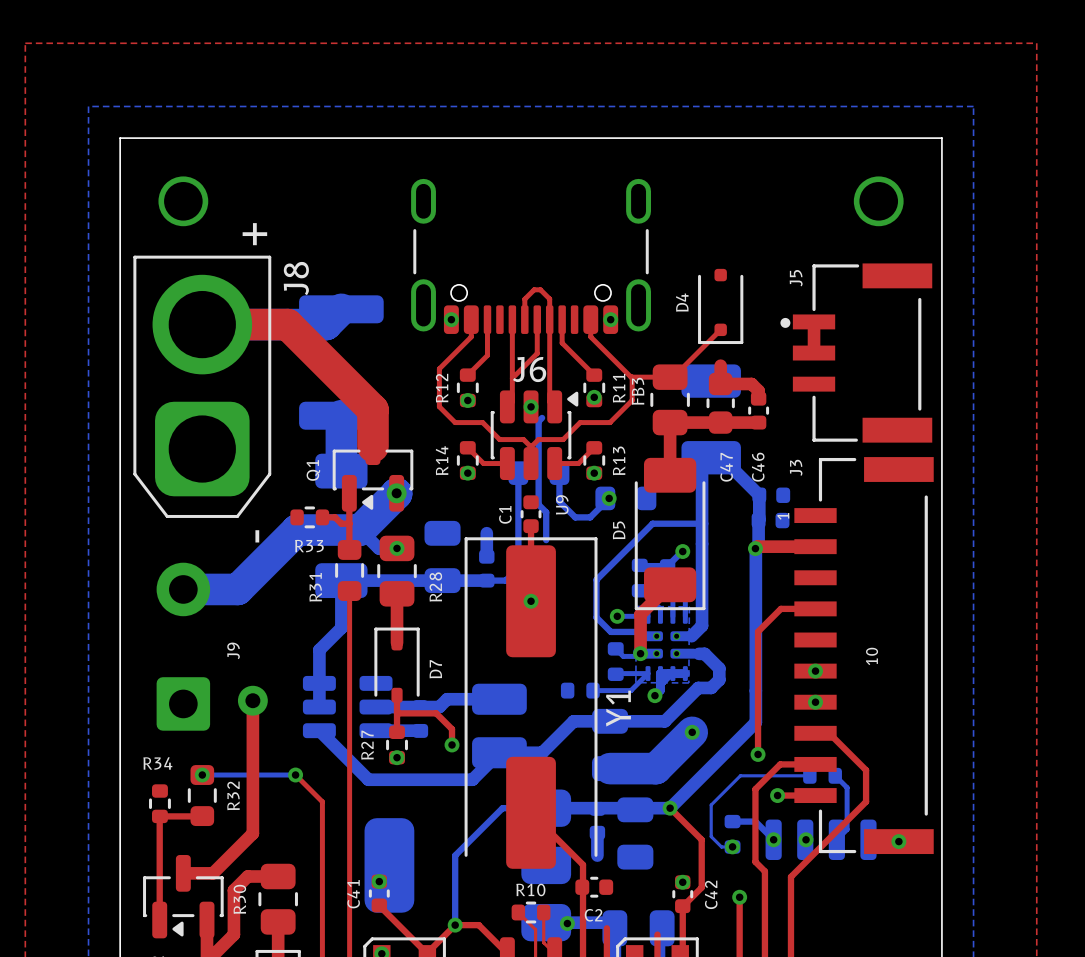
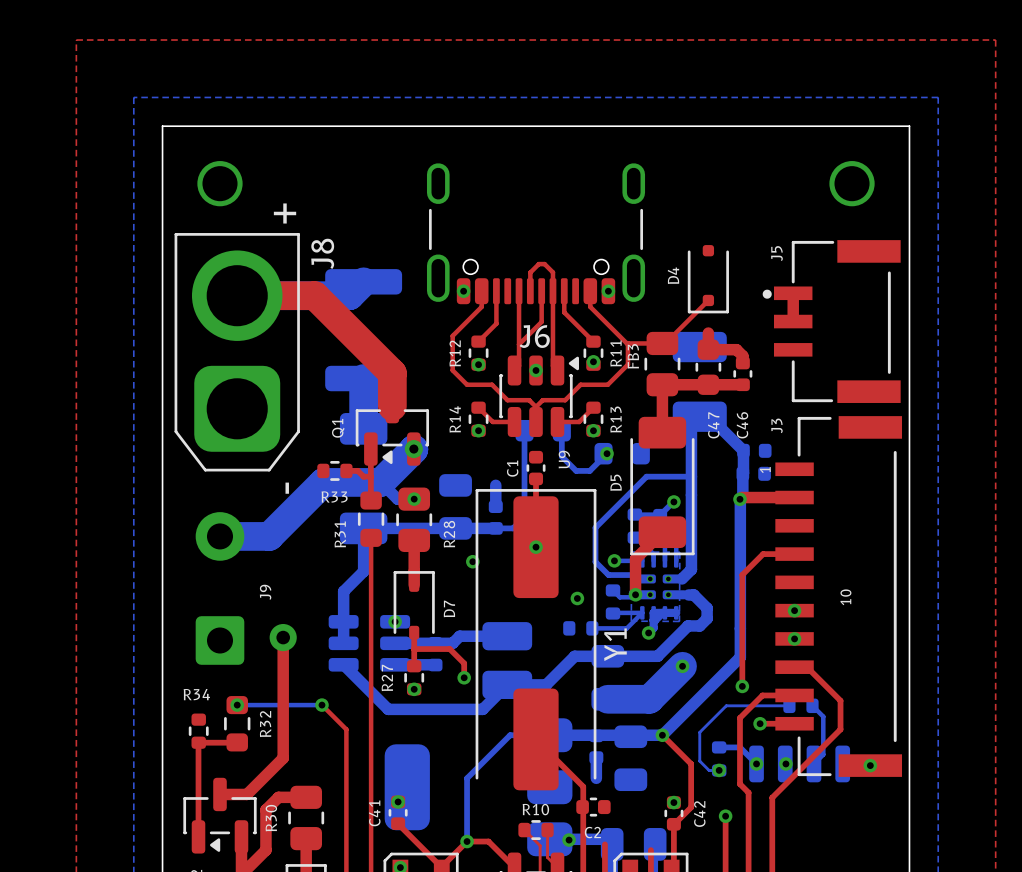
bottom track: (542, 417) (538, 421) (538, 504) (546, 512) (546, 540) -> none
via: none -> (472, 561)
via: none -> (577, 598)
via: none -> (395, 621)

